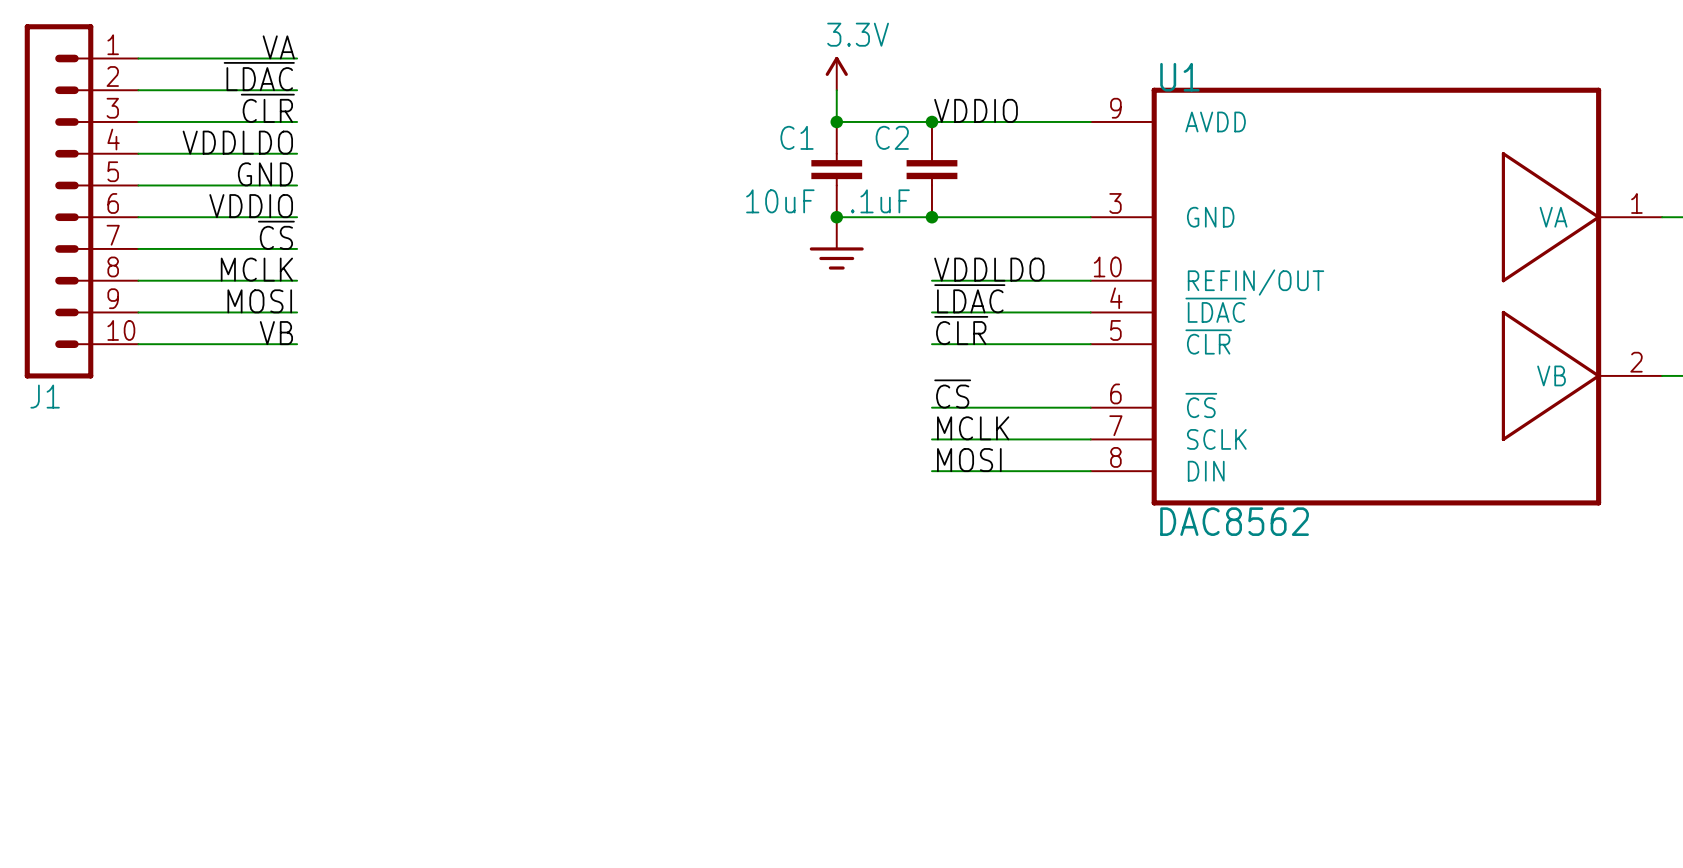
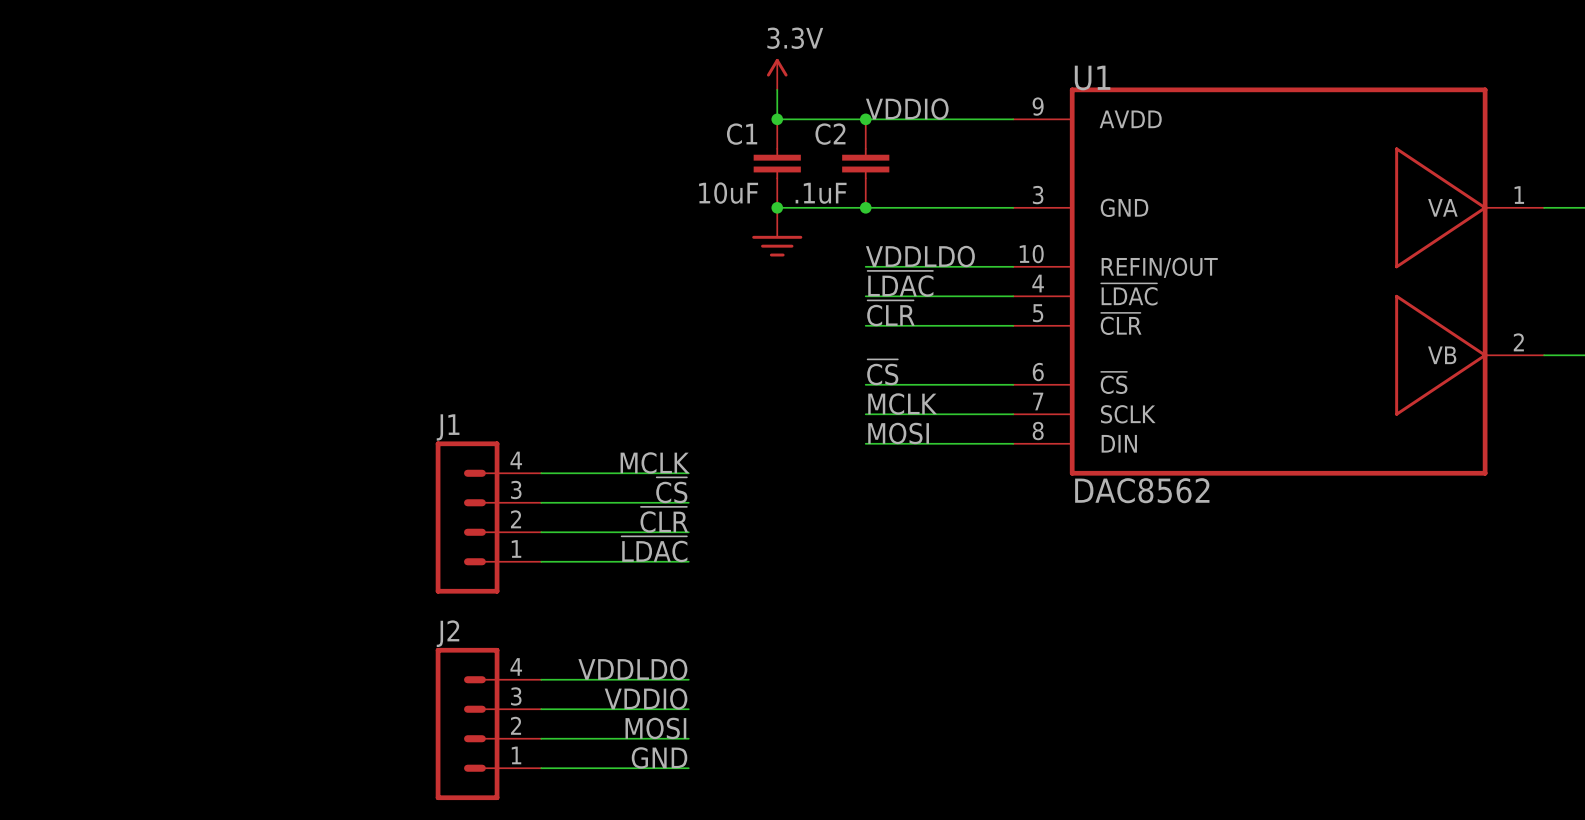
J1 symbol: [24, 24, 139, 379] -> [435, 441, 542, 594]
label: VA (278, 47) -> none
wire: (138, 58) (297, 58) -> none
label: ~{LDAC} (259, 76) -> none
wire: (138, 90) (297, 90) -> none
label: ~{CLR} (267, 108) -> none
wire: (138, 121) (297, 121) -> none
label: VDDLDO (237, 142) -> none
wire: (138, 153) (297, 153) -> none
label: GND (265, 174) -> none
wire: (138, 185) (297, 185) -> none
label: VDDIO (251, 206) -> none
wire: (138, 217) (297, 217) -> none
label: ~{CS} (276, 235) -> none
wire: (138, 248) (297, 248) -> none
label: MCLK (256, 269) -> none
wire: (138, 280) (297, 280) -> none
label: MOSI (259, 301) -> none
wire: (138, 312) (297, 312) -> none
label: VB (276, 333) -> none
wire: (138, 344) (297, 344) -> none
J1 name position: J1 (45, 396) -> J1 (448, 427)
label: none -> MCLK (654, 462)
wire: none -> (541, 473) (688, 473)
label: none -> ~{CS} (671, 490)
wire: none -> (541, 502) (688, 502)
label: none -> ~{CLR} (664, 519)
wire: none -> (541, 532) (688, 532)
label: none -> ~{LDAC} (654, 549)
wire: none -> (541, 561) (688, 561)
label: none -> VDDLDO (632, 669)
wire: none -> (541, 679) (688, 679)
label: none -> VDDIO (646, 698)
wire: none -> (541, 709) (688, 709)
J2: none -> (488, 723)
label: none -> MOSI (655, 728)
wire: none -> (541, 738) (688, 738)
label: none -> GND (659, 757)
wire: none -> (541, 768) (688, 768)

